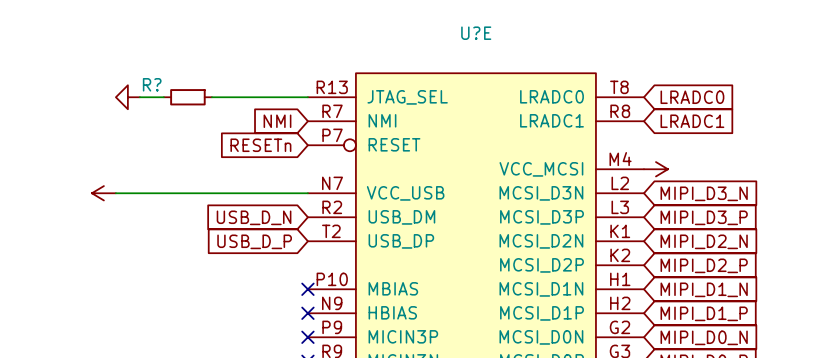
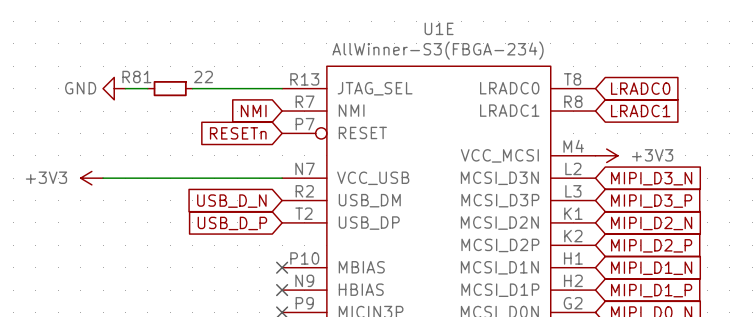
U?E name: U?E (476, 33) -> U1E (439, 28)
U?E value: none -> AllWinner-S3(FBGA-234) (438, 50)
R? name: R? (152, 84) -> R81 (136, 77)
R? value: none -> 22 (203, 77)
power symbol text: none -> GND (80, 88)
power symbol text: none -> +3V3 (652, 155)
power symbol text: none -> +3V3 (46, 177)

